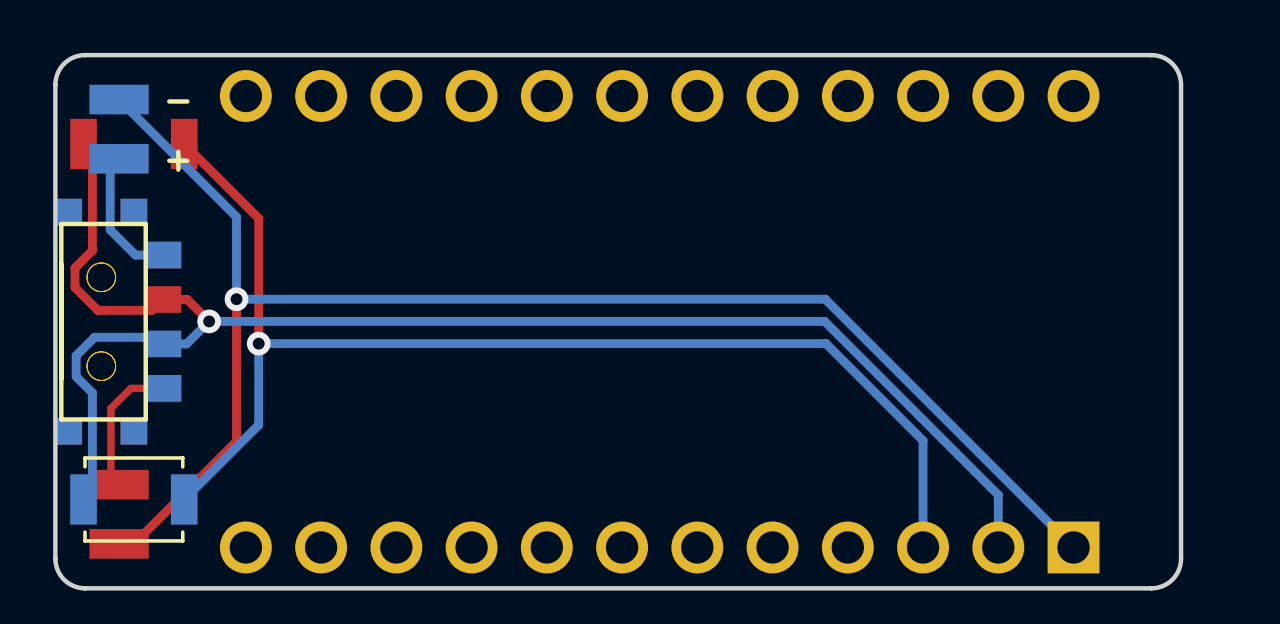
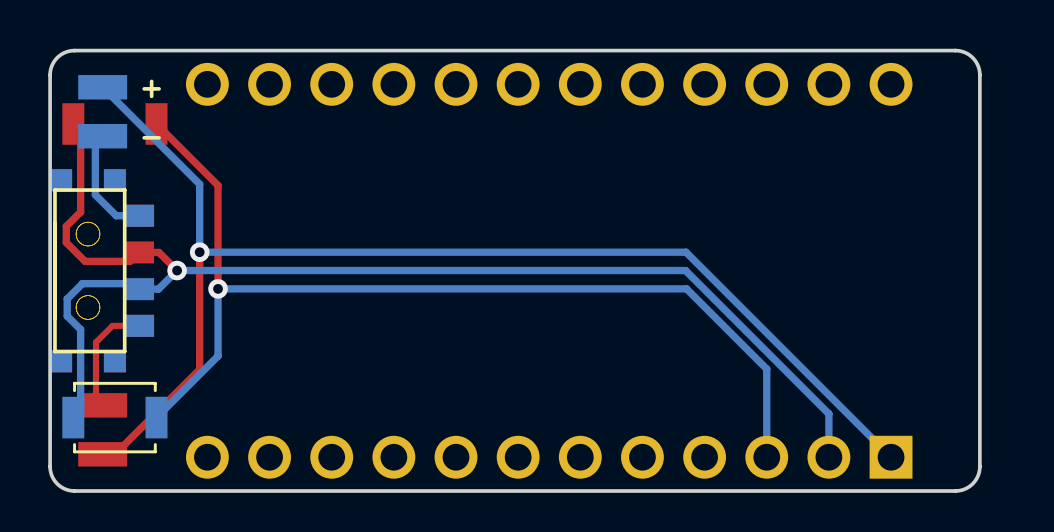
part text: - (178, 101) -> + (151, 88)
part text: + (178, 160) -> - (151, 137)

